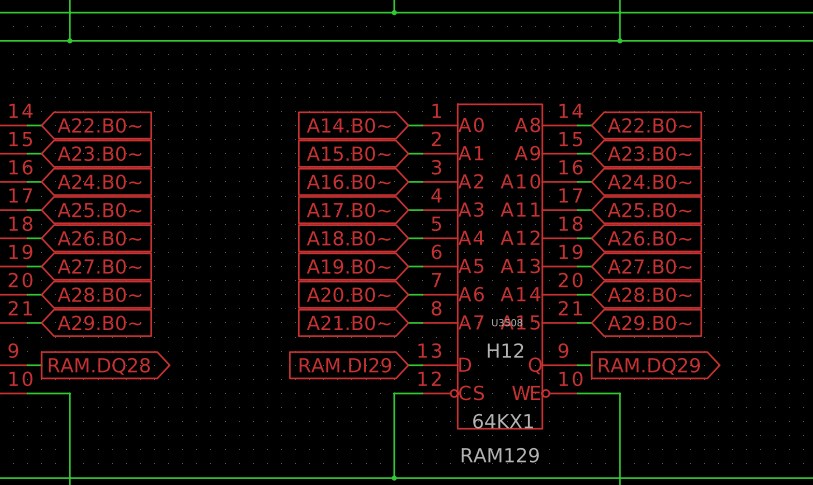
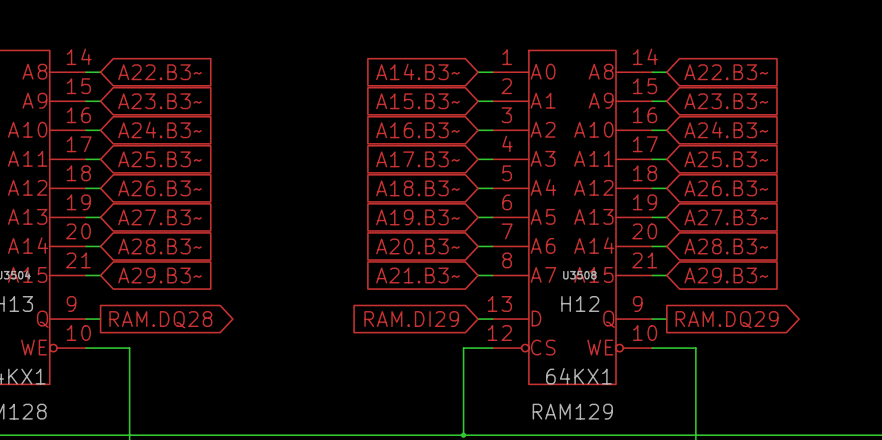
global label: A22.B0~ (99, 125) -> A22.B3~ (160, 72)
global label: A14.B0~ (348, 125) -> A14.B3~ (417, 71)
global label: A22.B0~ (649, 125) -> A22.B3~ (726, 72)
global label: A23.B0~ (99, 153) -> A23.B3~ (160, 101)
global label: A15.B0~ (348, 153) -> A15.B3~ (417, 101)
global label: A23.B0~ (649, 153) -> A23.B3~ (726, 101)
global label: A24.B0~ (99, 181) -> A24.B3~ (160, 129)
global label: A16.B0~ (348, 181) -> A16.B3~ (417, 130)
global label: A24.B0~ (649, 181) -> A24.B3~ (726, 129)
global label: A25.B0~ (99, 210) -> A25.B3~ (160, 159)
global label: A17.B0~ (348, 210) -> A17.B3~ (417, 159)
global label: A25.B0~ (649, 210) -> A25.B3~ (726, 159)
global label: A26.B0~ (99, 238) -> A26.B3~ (160, 188)
global label: A18.B0~ (348, 238) -> A18.B3~ (417, 188)
global label: A26.B0~ (649, 238) -> A26.B3~ (726, 188)
global label: A27.B0~ (99, 266) -> A27.B3~ (160, 217)
global label: A19.B0~ (348, 266) -> A19.B3~ (417, 217)
global label: A27.B0~ (649, 266) -> A27.B3~ (726, 217)
global label: A28.B0~ (99, 294) -> A28.B3~ (160, 246)
global label: A20.B0~ (348, 294) -> A20.B3~ (417, 246)
global label: A28.B0~ (649, 294) -> A28.B3~ (726, 246)
global label: A29.B0~ (99, 322) -> A29.B3~ (160, 275)
global label: A21.B0~ (348, 322) -> A21.B3~ (417, 275)
global label: A29.B0~ (649, 322) -> A29.B3~ (726, 275)

